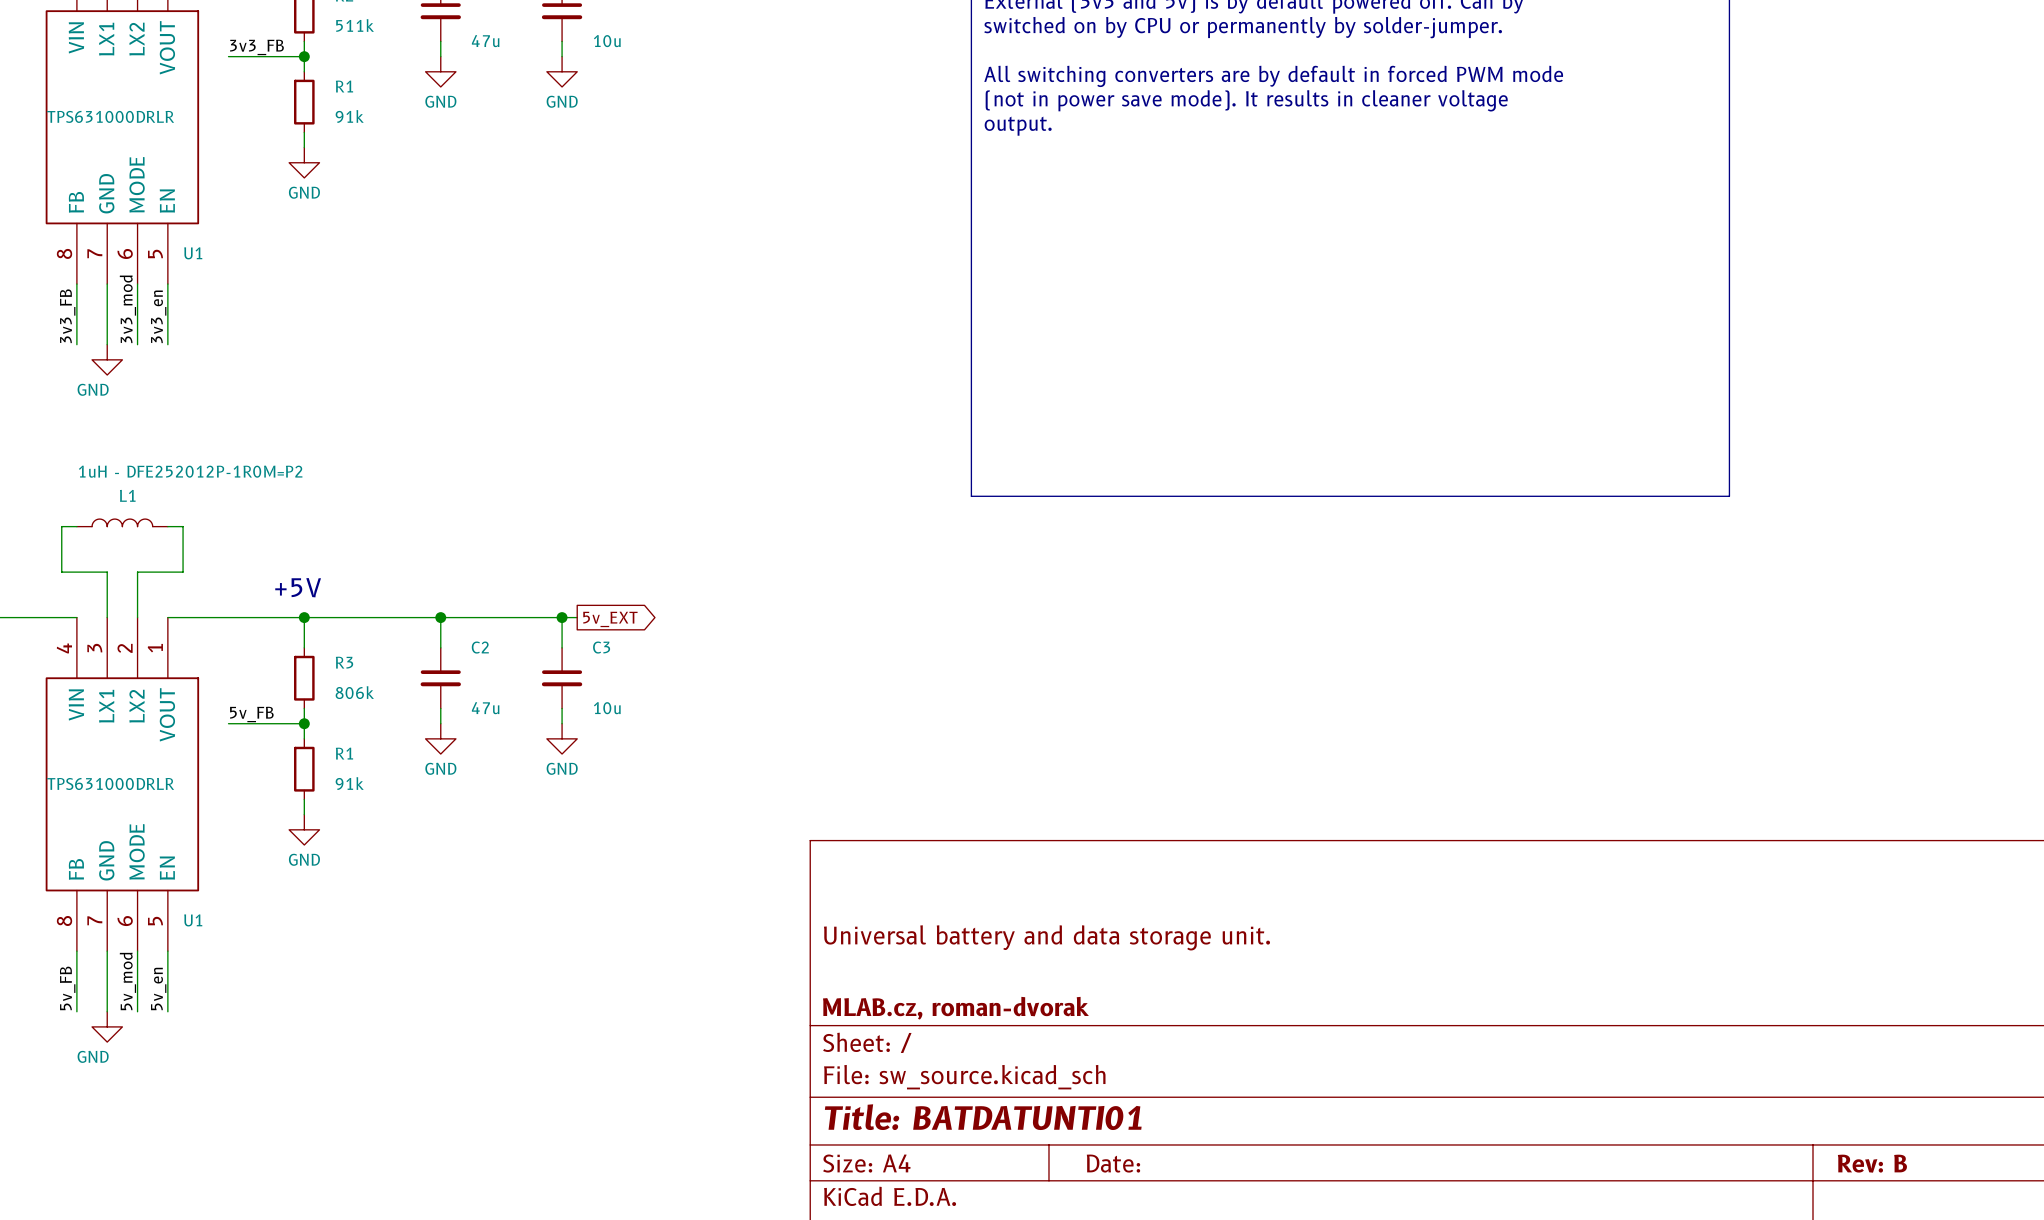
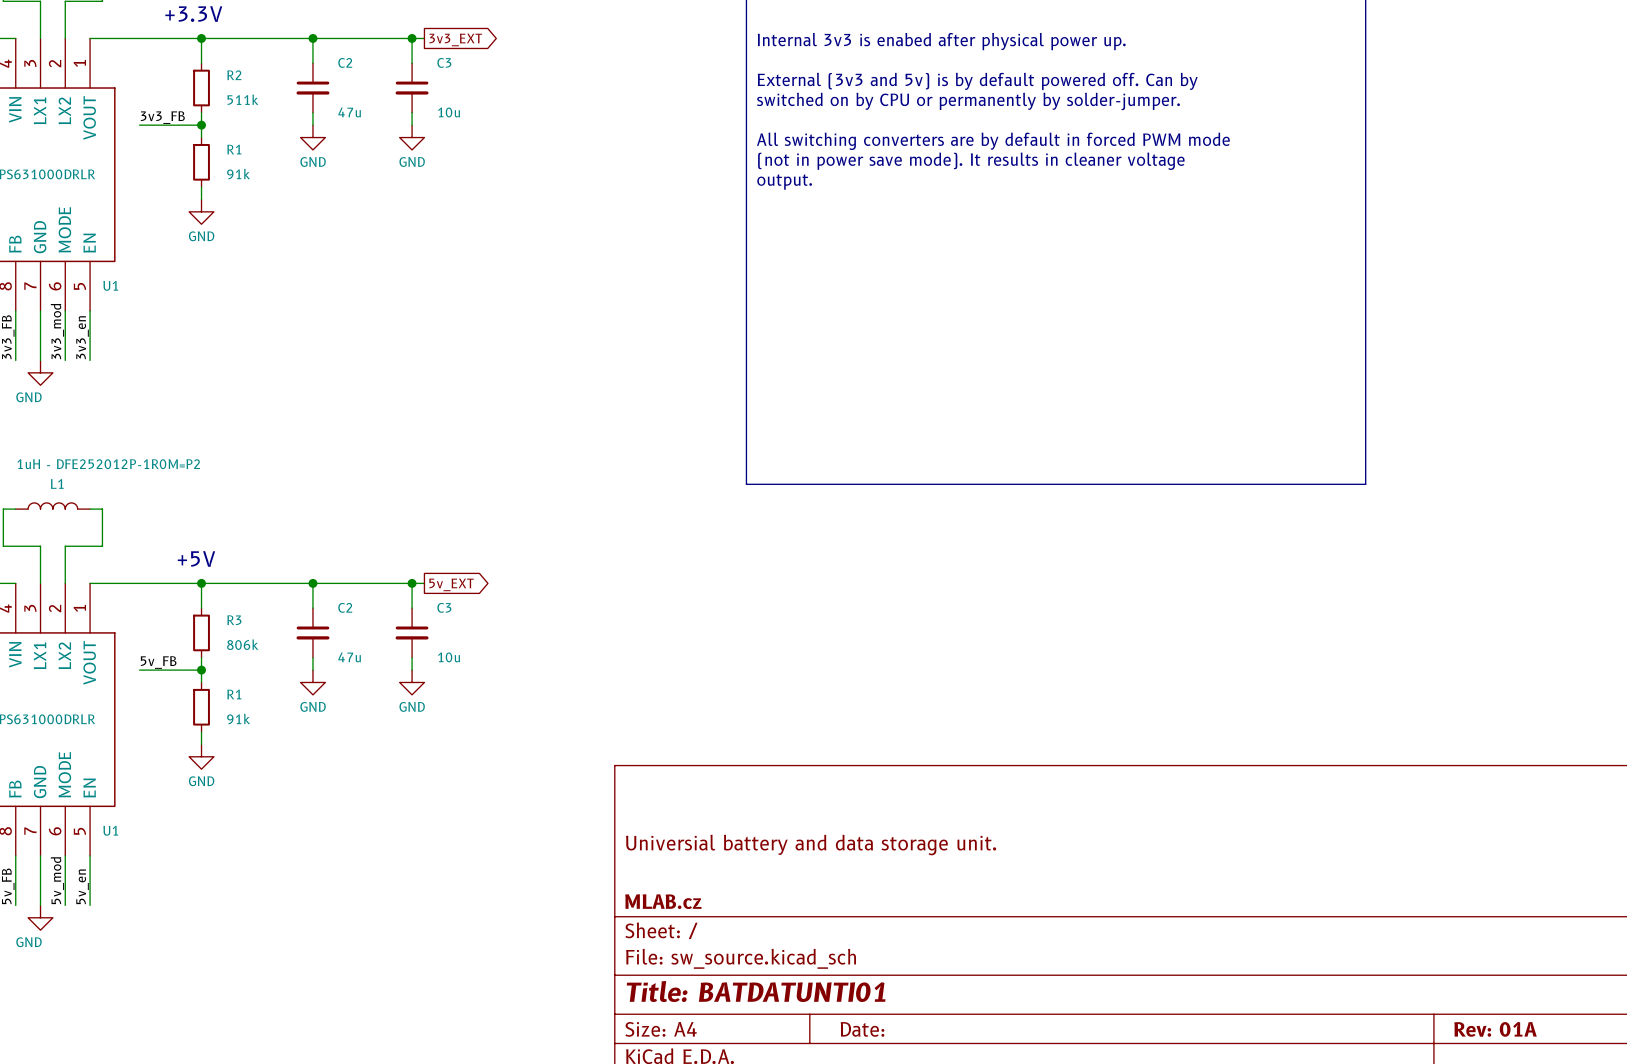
title block: Universal battery and data storage unit. (1046, 937) -> Universial battery and data storage unit. (811, 845)
title block: MLAB.cz, roman-dvorak (955, 1008) -> MLAB.cz (663, 901)
title block: Rev: B (1872, 1163) -> Rev: 01A (1495, 1029)

